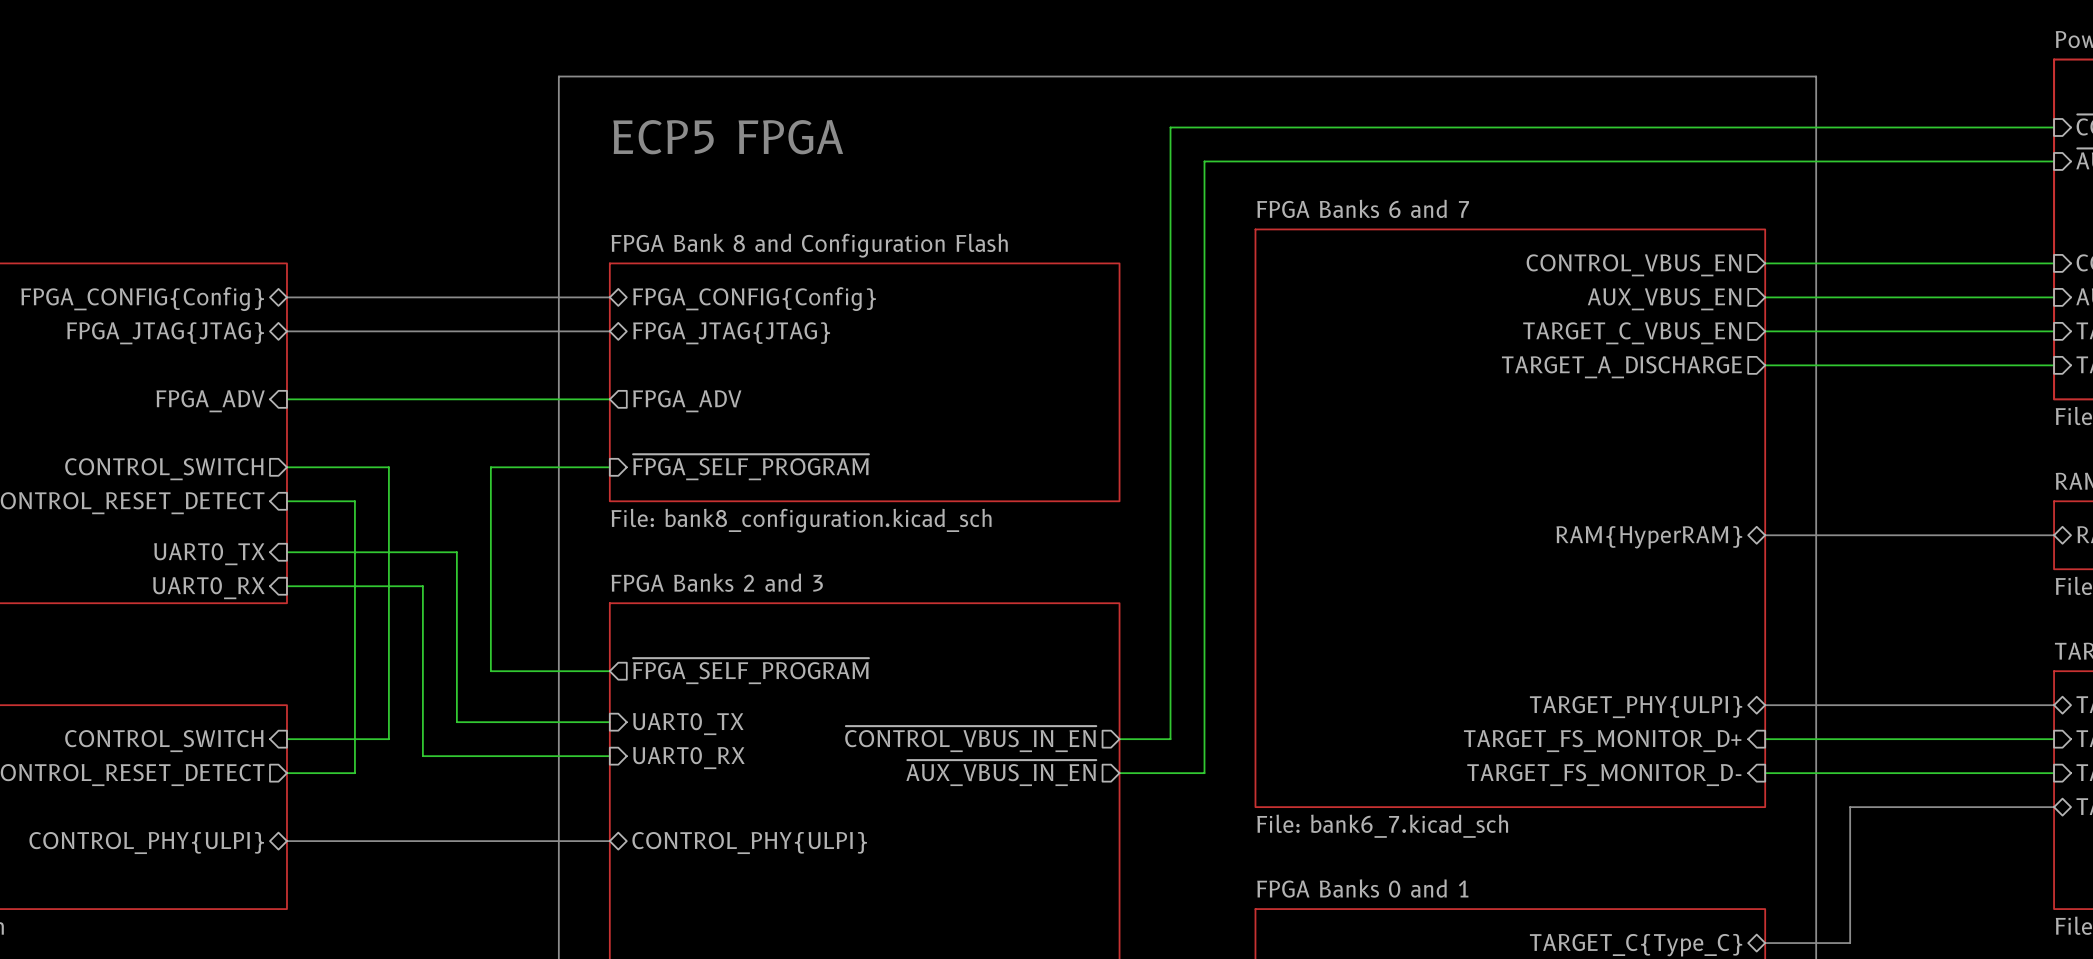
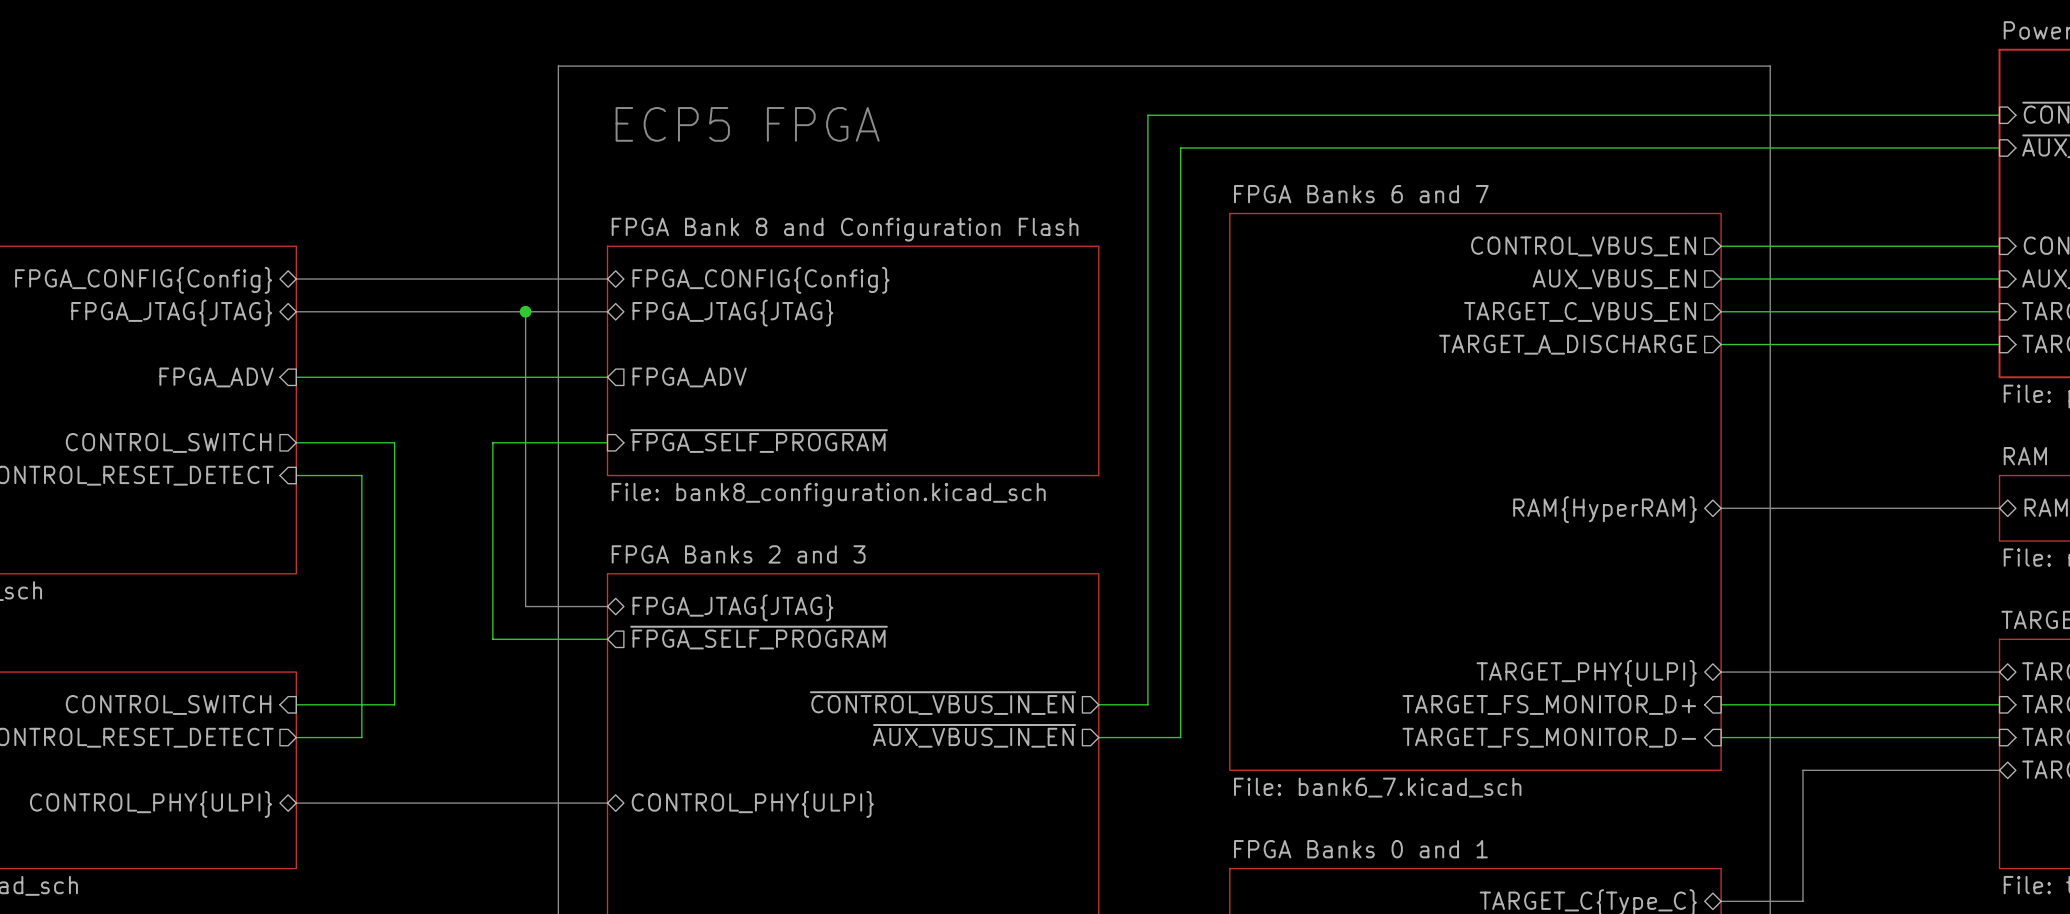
bus: none -> (525, 311) (525, 606) (607, 606)
junction: none -> (525, 311)
wire: (286, 552) (456, 552) (456, 722) (609, 722) -> none
sheet pin: UART0_TX (209, 554) -> none
wire: (286, 586) (422, 586) (422, 756) (609, 756) -> none
sheet pin: UART0_RX (208, 588) -> none
sheet pin: none -> FPGA_JTAG{JTAG} (732, 607)
sheet pin: UART0_TX (688, 724) -> none
sheet pin: UART0_RX (688, 758) -> none

